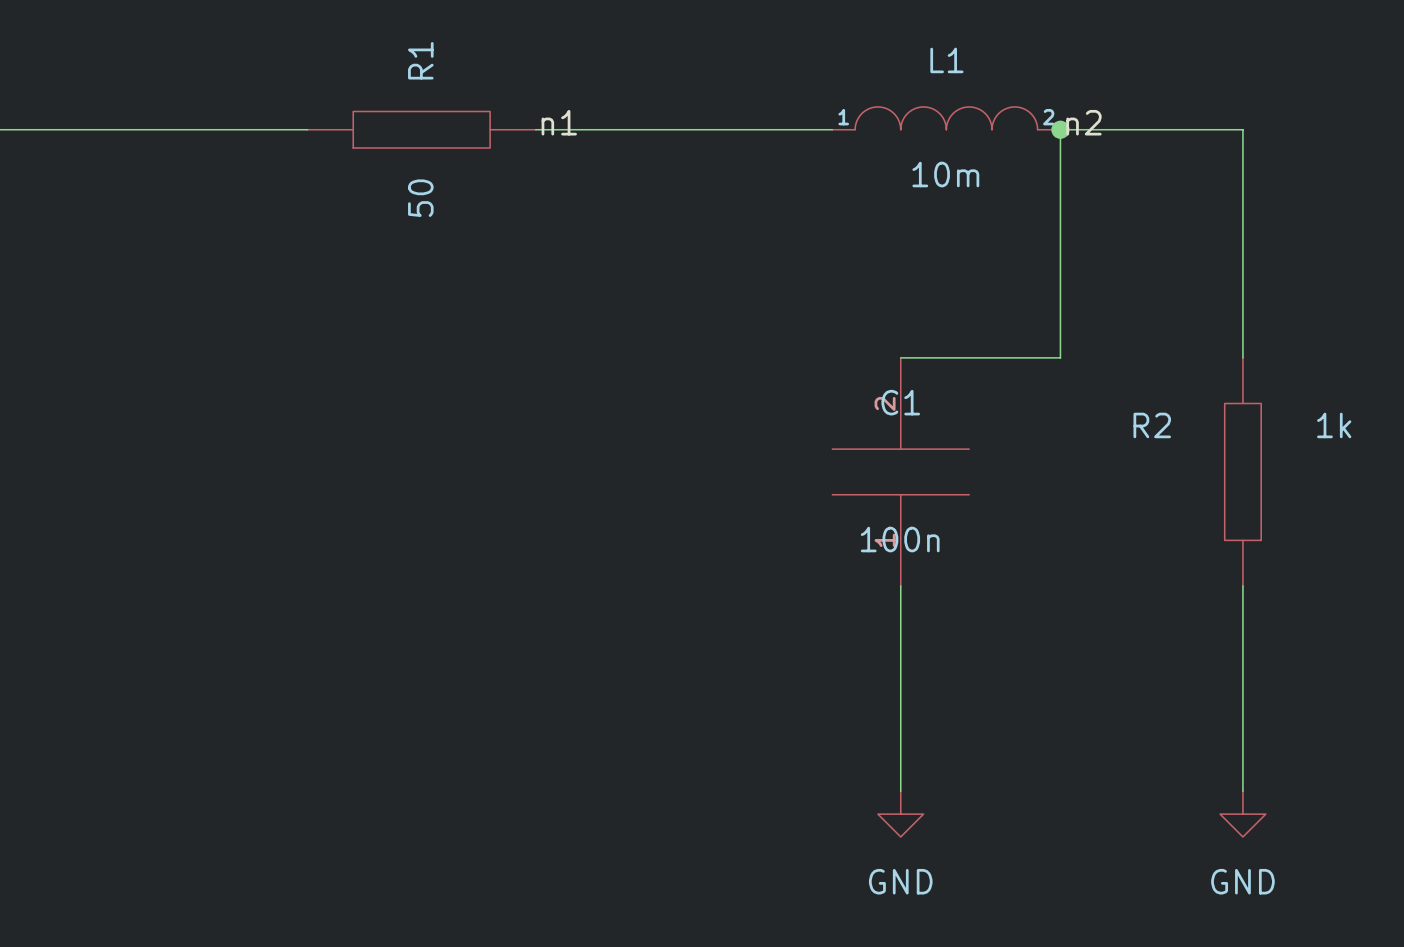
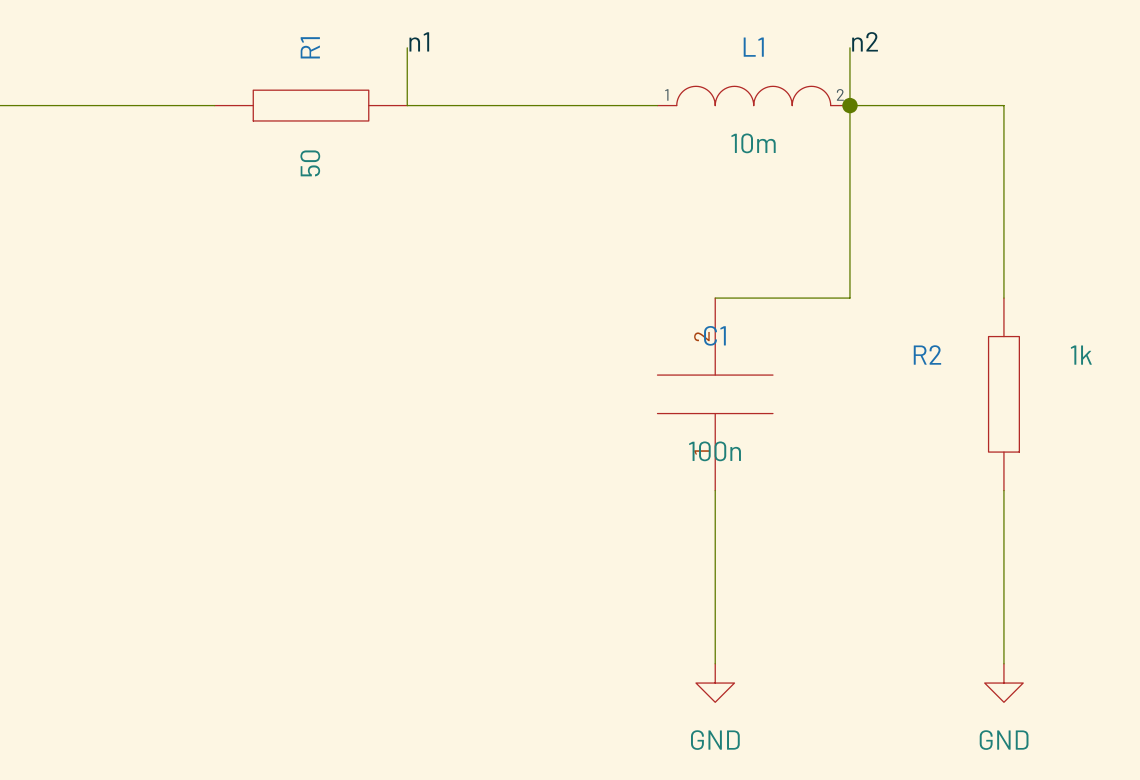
wire: none -> (407, 47) (407, 105)
wire: none -> (849, 47) (849, 105)
label position: n1 (559, 122) -> n1 (419, 41)
label position: n2 (1083, 122) -> n2 (865, 41)

